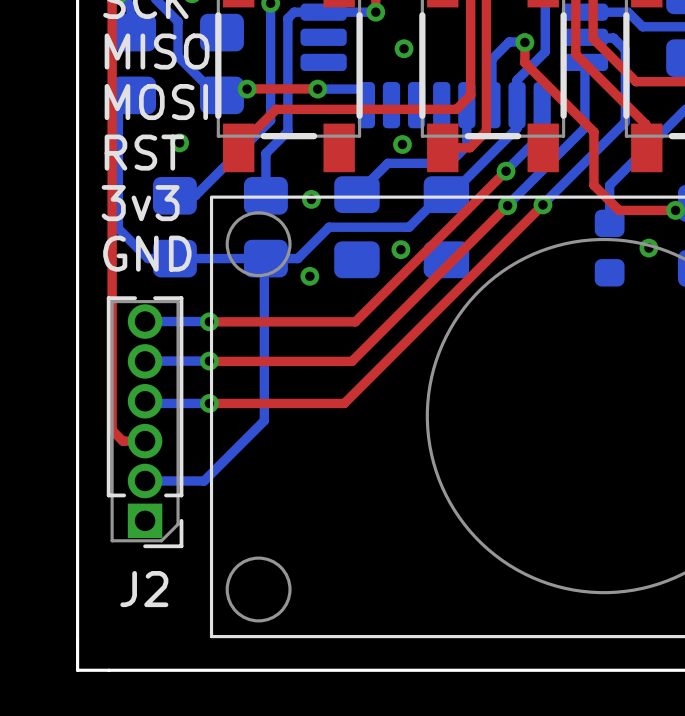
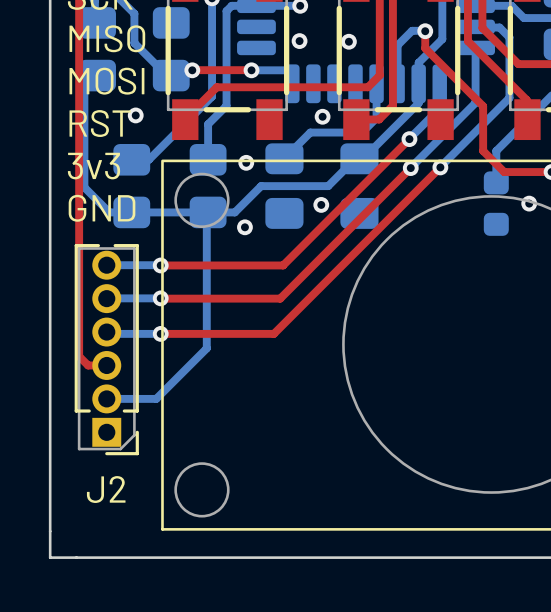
via: (404, 48) -> none
via: none -> (299, 41)
via: none -> (348, 41)

